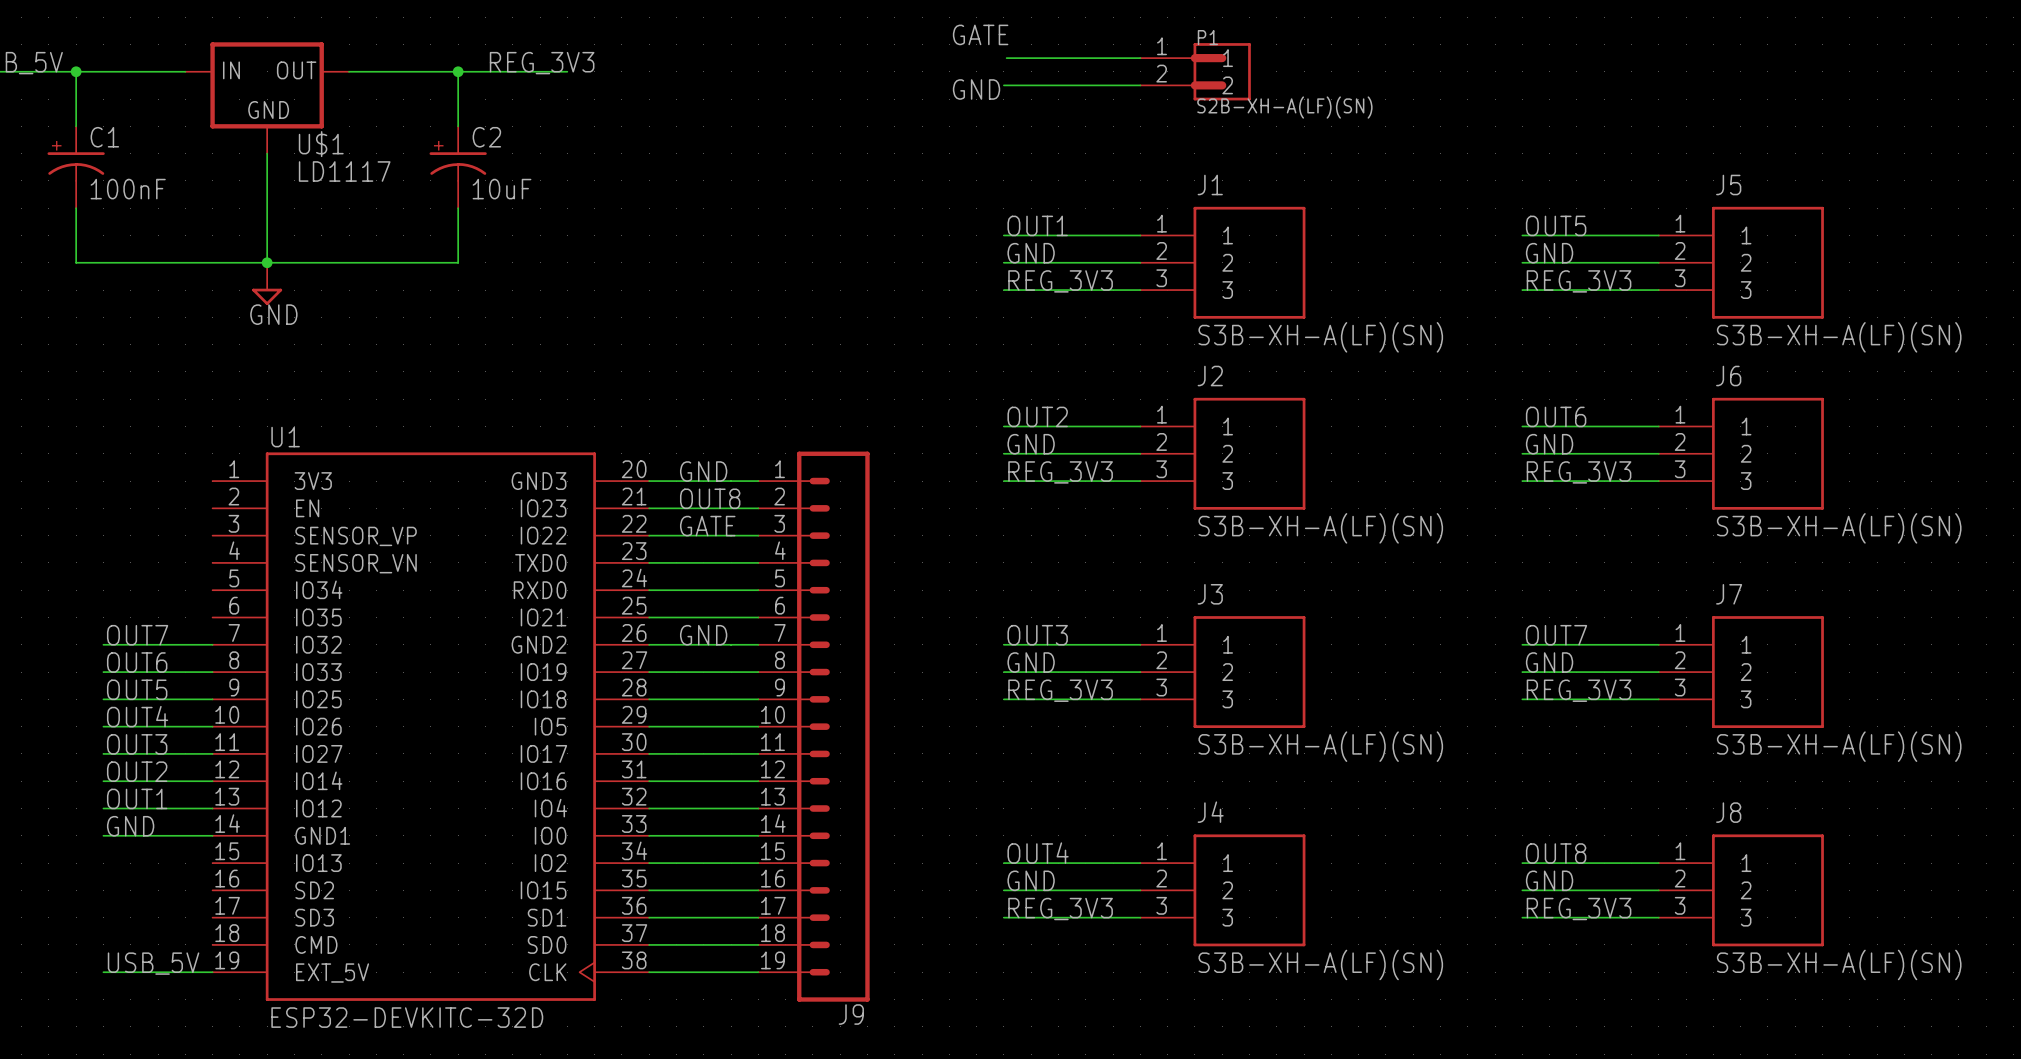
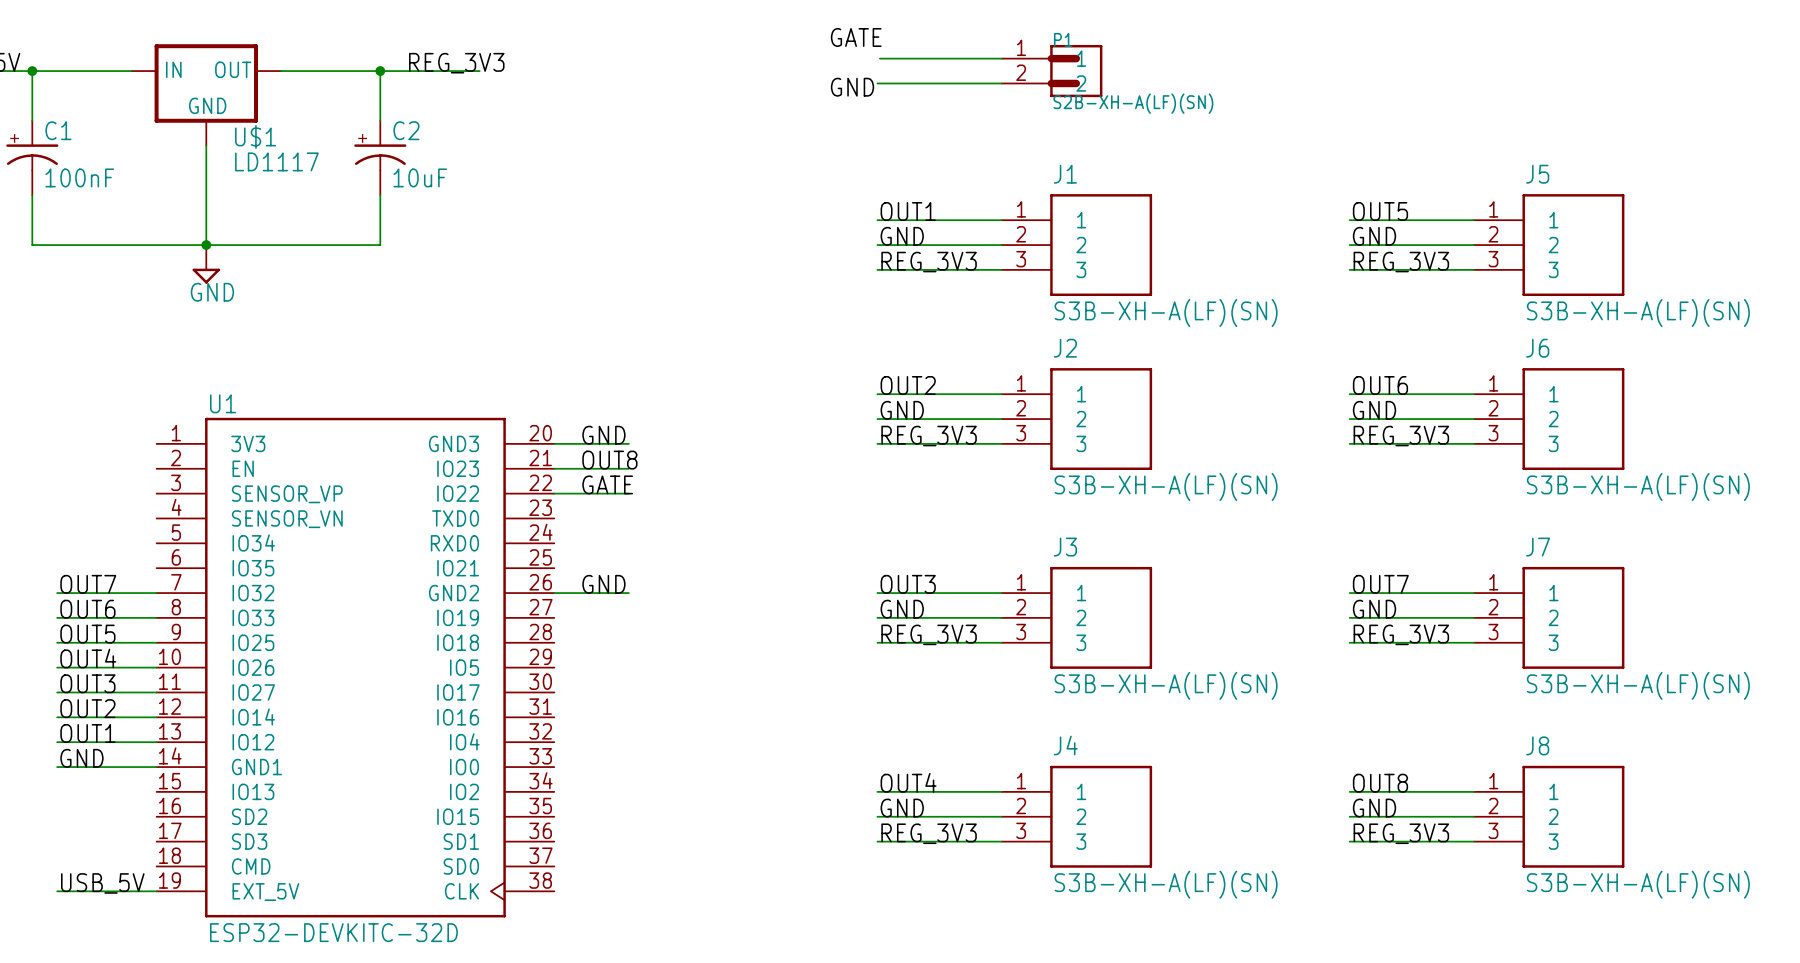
wire: (731, 481) (758, 481) -> none
wire: (731, 508) (758, 508) -> none
wire: (731, 535) (758, 535) -> none
wire: (649, 562) (758, 562) -> none
wire: (649, 590) (758, 590) -> none
wire: (649, 617) (758, 617) -> none
wire: (731, 644) (758, 644) -> none
wire: (649, 672) (758, 672) -> none
wire: (649, 699) (758, 699) -> none
wire: (649, 726) (758, 726) -> none
J9: (813, 726) -> none
wire: (649, 753) (758, 753) -> none
wire: (649, 781) (758, 781) -> none
wire: (649, 808) (758, 808) -> none
wire: (649, 835) (758, 835) -> none
wire: (649, 863) (758, 863) -> none
wire: (649, 890) (758, 890) -> none
wire: (649, 917) (758, 917) -> none
wire: (649, 944) (758, 944) -> none
wire: (649, 972) (758, 972) -> none

